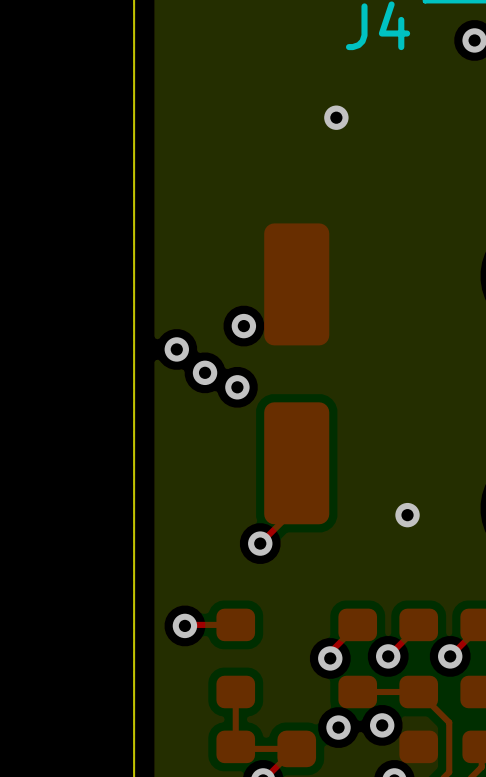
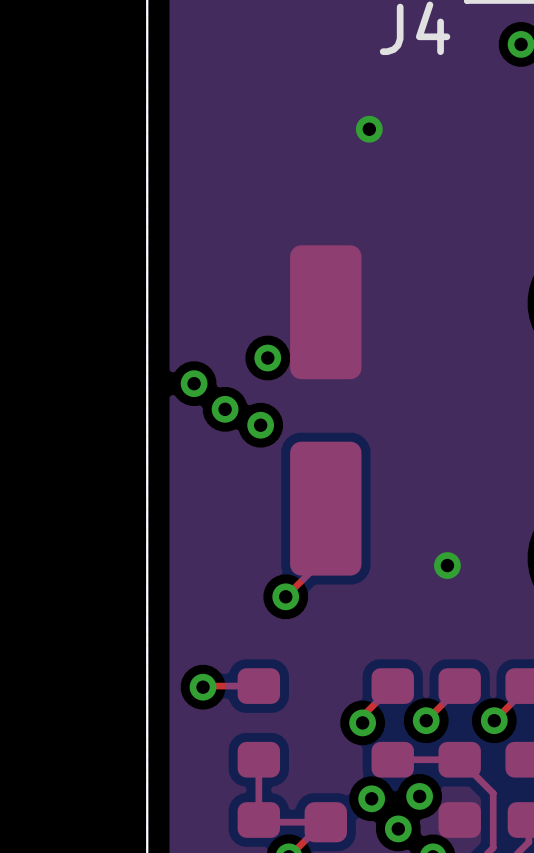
via: none -> (398, 828)

